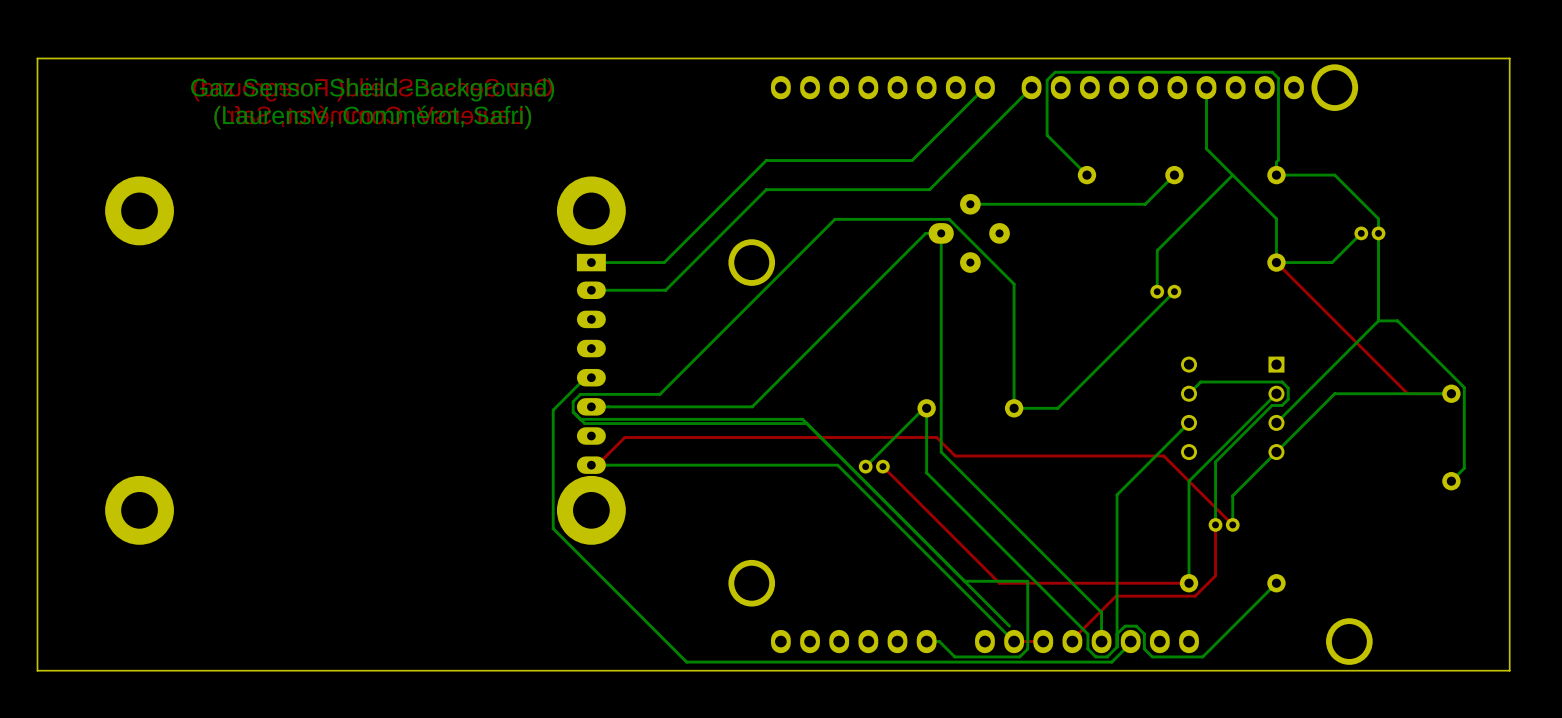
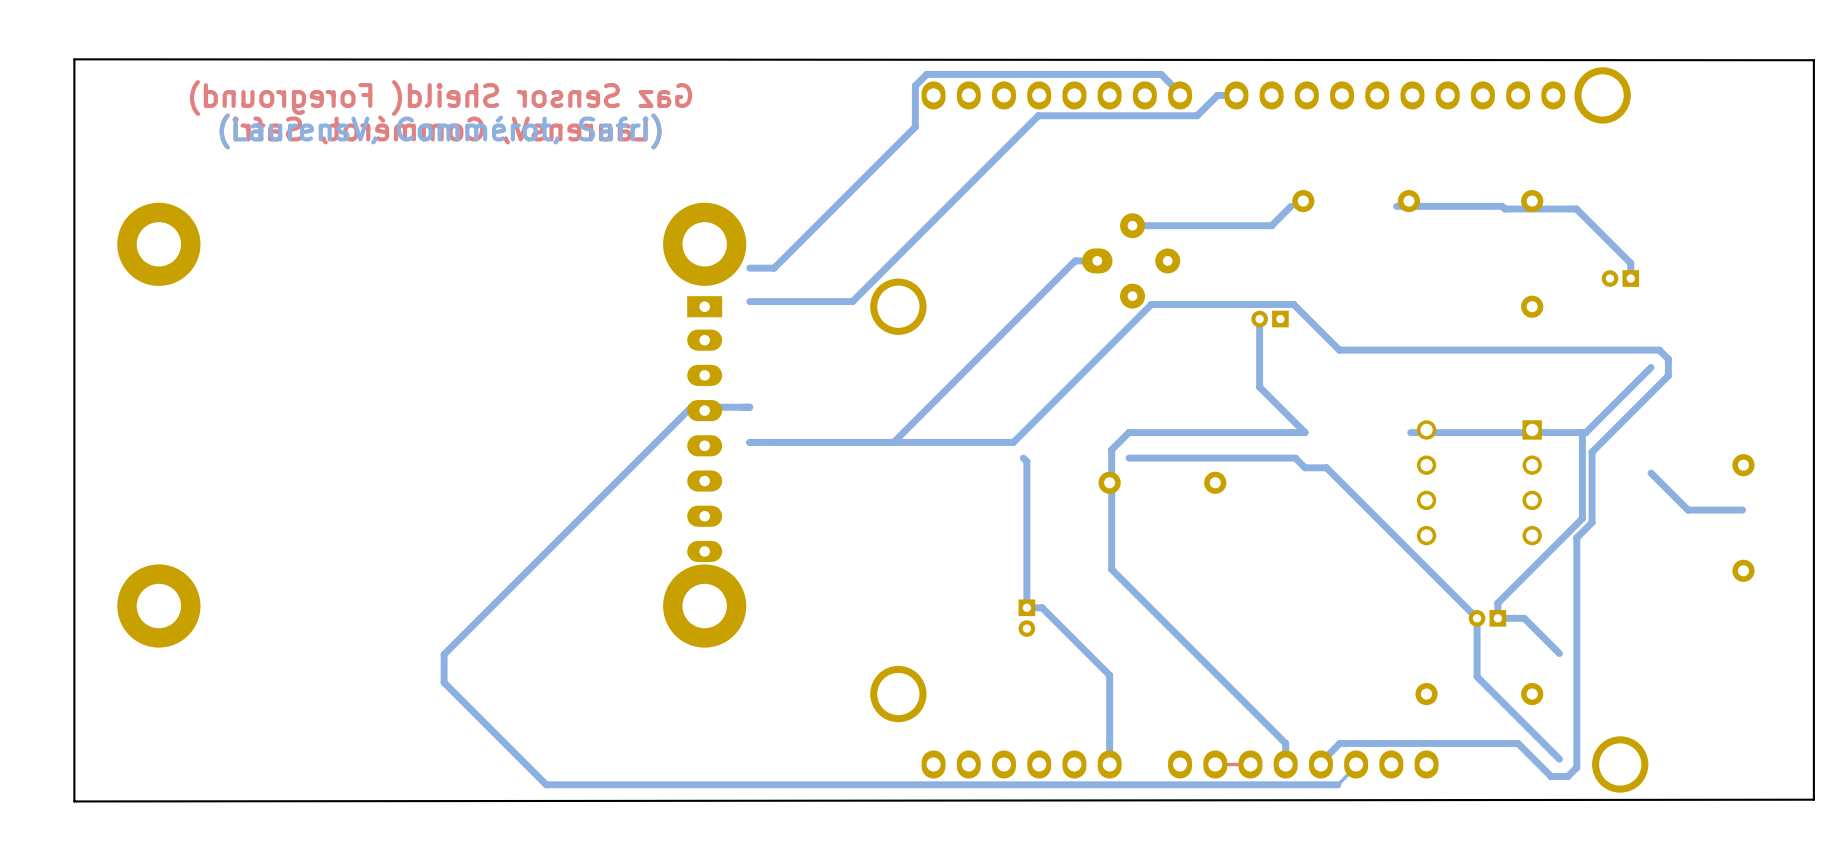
board edge: (1509, 58) (37, 58) (37, 670) (1509, 670) -> (1813, 60) (74, 59) (74, 801) (1813, 799)
bottom track: (984, 87) (912, 160) (766, 160) (664, 262) (591, 262) -> (1180, 95) (1161, 74) (926, 74) (915, 85) (915, 126) (774, 268) (749, 268)
bottom track: (1031, 87) (929, 189) (766, 189) (665, 290) (591, 290) -> (1236, 95) (1217, 95) (1197, 115) (1038, 115) (852, 301) (749, 301)
bottom track: (1206, 87) (1206, 148) (1276, 218) (1276, 262) (1332, 262) (1361, 233) -> none
text: Gaz Sensor Sheild -Background) (372, 89) -> none
bottom track: (1086, 175) (1047, 135) (1047, 80) (1055, 72) (1272, 72) (1278, 78) (1278, 160) (1276, 162) (1276, 175) (1334, 175) (1378, 218) (1378, 320) -> none
bottom track: (1174, 175) (1145, 204) (970, 204) -> none
bottom track: (1232, 175) (1157, 250) (1157, 291) -> none
bottom track: none -> (1290, 206) (1271, 225) (1132, 225)
bottom track: none -> (1396, 206) (1502, 206) (1504, 208) (1576, 208) (1630, 263) (1630, 278)
bottom track: none -> (1097, 260) (1075, 260) (893, 442)
part position: (969, 233) -> (1131, 260)
part: (1369, 233) -> none
part: none -> (1620, 278)
top track: (1276, 262) (1407, 393) (1451, 393) -> none
bottom track: none -> (1259, 319) (1259, 387) (1305, 432) (1128, 432) (1111, 449) (1111, 569) (1285, 743) (1285, 764)
part: none -> (1270, 319)
part: (1165, 291) -> none
bottom track: (1174, 291) (1057, 408) (1014, 408) (1014, 284) (949, 219) (834, 219) (659, 394) (580, 394) (573, 401) (573, 412) (584, 423) (806, 423) -> none
bottom track: none -> (1651, 367) (1585, 432) (1410, 432)
bottom track: (1378, 320) (1276, 422) -> none
bottom track: (1378, 320) (1397, 320) (1464, 387) (1464, 468) (1451, 481) -> none
bottom track: none -> (1582, 432) (1582, 518) (1497, 603) (1497, 618) (1524, 618) (1559, 653)
bottom track: (591, 377) (585, 377) (553, 410) (553, 528) (686, 662) (1111, 662) (1115, 658) -> (749, 407) (691, 407) (444, 654) (444, 682) (546, 784) (1337, 784)
bottom track: none -> (1129, 458) (1295, 458) (1305, 467) (1326, 467) (1477, 618) (1477, 676) (1559, 759)
bottom track: (1189, 393) (1200, 381) (1282, 381) (1288, 388) (1288, 399) (1282, 405) (1272, 405) (1215, 461) (1215, 524) -> none
bottom track: (1276, 393) (1189, 481) (1189, 583) -> none
bottom track: (1451, 393) (1334, 393) (1232, 495) (1232, 524) -> none
bottom track: none -> (1651, 473) (1688, 510) (1742, 510)
bottom track: (591, 406) (752, 406) (925, 233) (941, 233) (941, 452) (1101, 612) (1101, 639) -> (749, 442) (1013, 442) (1151, 304) (1293, 304) (1339, 350) (1659, 350) (1668, 359) (1668, 375) (1592, 452) (1592, 522) (1576, 537) (1576, 767) (1567, 776) (1551, 776) (1518, 743) (1339, 743) (1320, 762)
bottom track: (580, 419) (802, 419) (1009, 626) -> none
bottom track: (1189, 422) (1117, 494) (1117, 647) (1107, 656) (1095, 656) (1087, 648) (1087, 634) (926, 472) (926, 408) (924, 408) (865, 466) -> none
bottom track: (591, 465) (837, 465) (1014, 641) -> none
top track: (597, 465) (624, 437) (936, 437) (955, 456) (1163, 456) (1232, 524) -> none
part: (874, 466) -> none
top track: (882, 466) (999, 583) (1189, 583) -> none
part: none -> (1026, 618)
part: none -> (1487, 618)
top track: (1215, 524) (1215, 575) (1195, 596) (1116, 596) (1072, 641) -> none
part: (1224, 524) -> none
bottom track: (964, 581) (1027, 581) (1027, 648) (1019, 656) (954, 656) (939, 641) (926, 641) -> (1023, 458) (1026, 461) (1026, 607) (1042, 607) (1109, 675) (1109, 764)
bottom track: (1276, 583) (1202, 656) (1152, 656) (1144, 648) (1144, 634) (1136, 626) (1125, 626) (1117, 634) -> none

